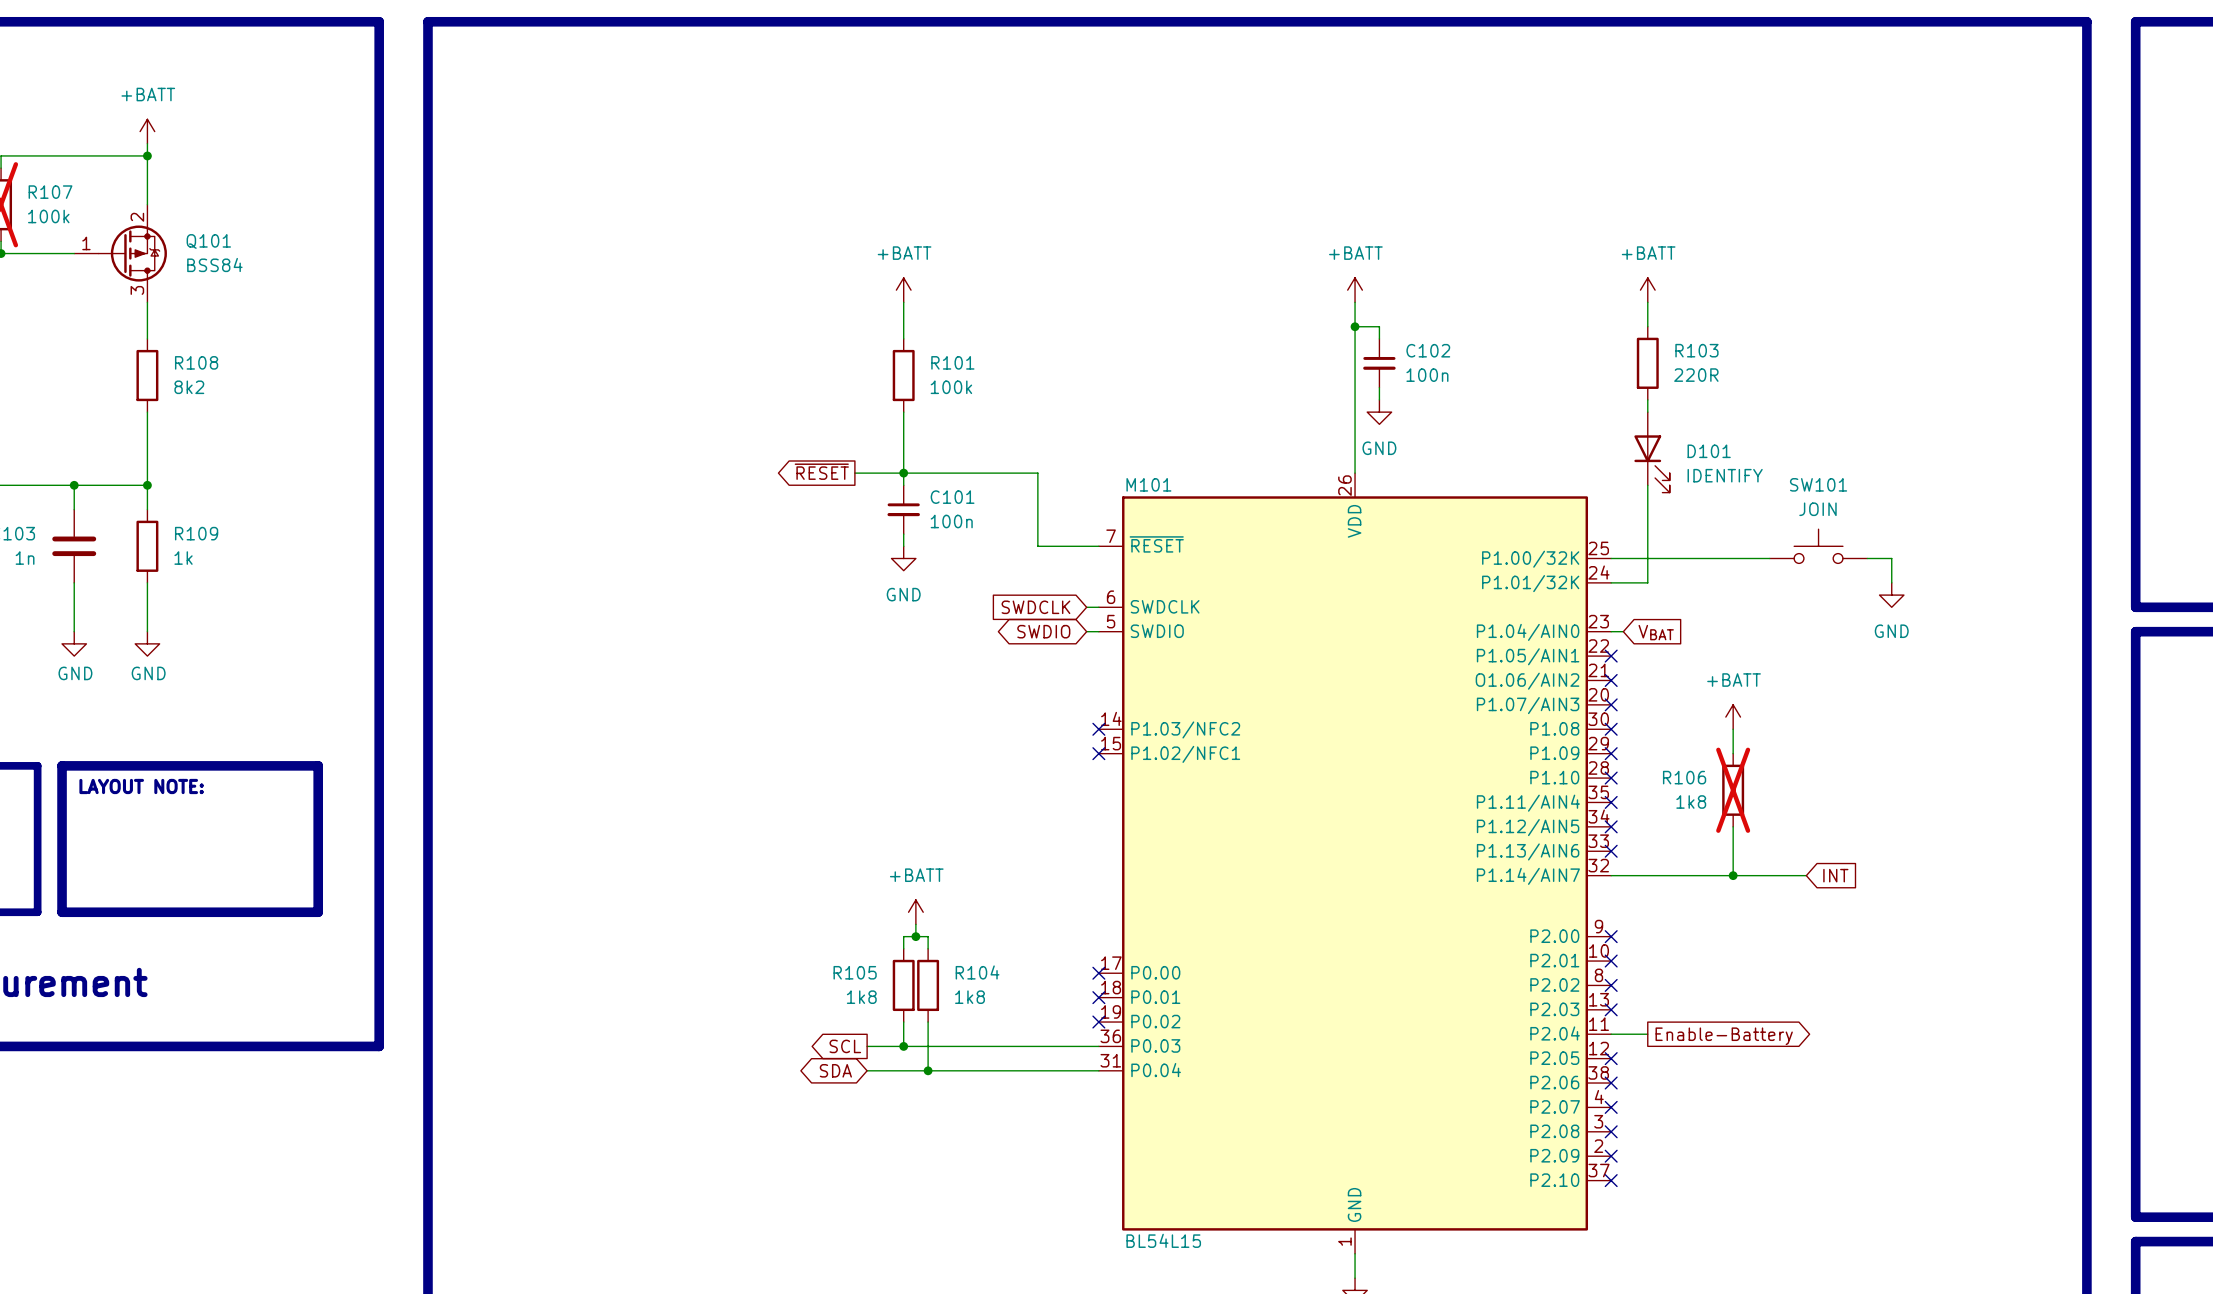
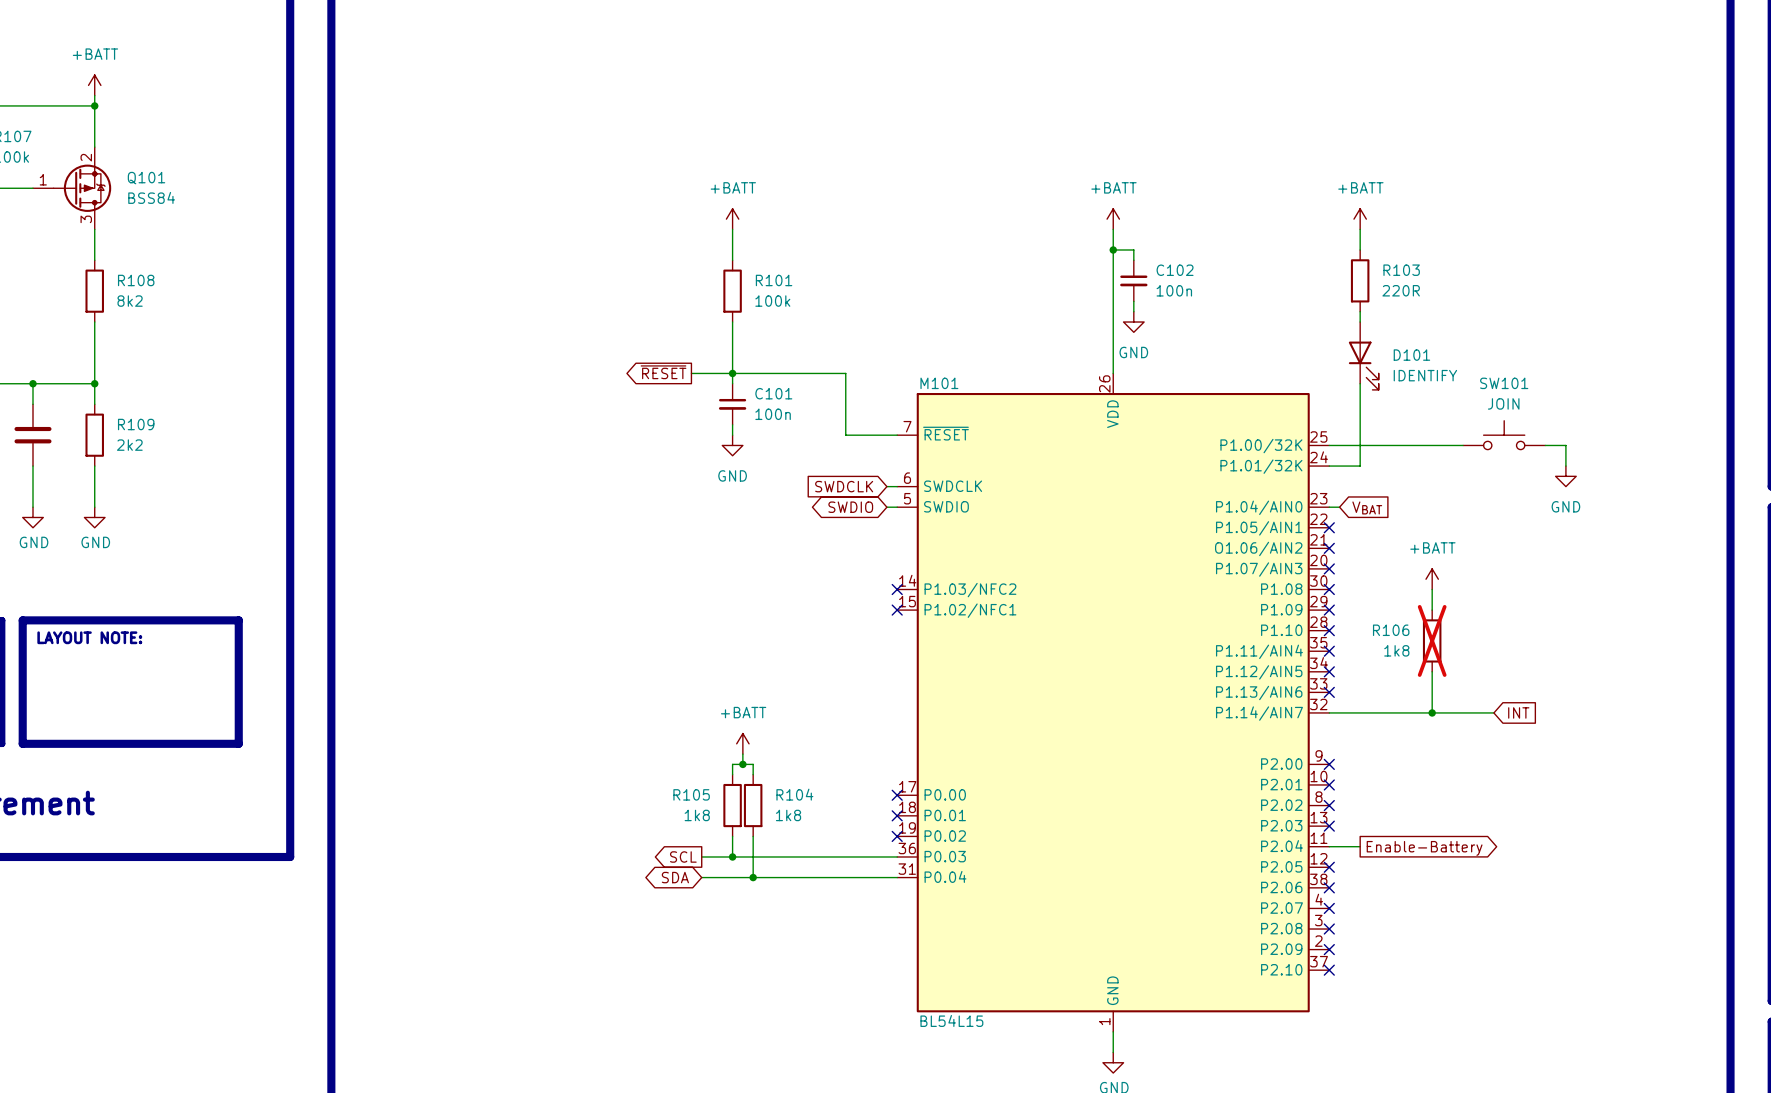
R109 value: 1k (183, 558) -> 2k2 (129, 445)

